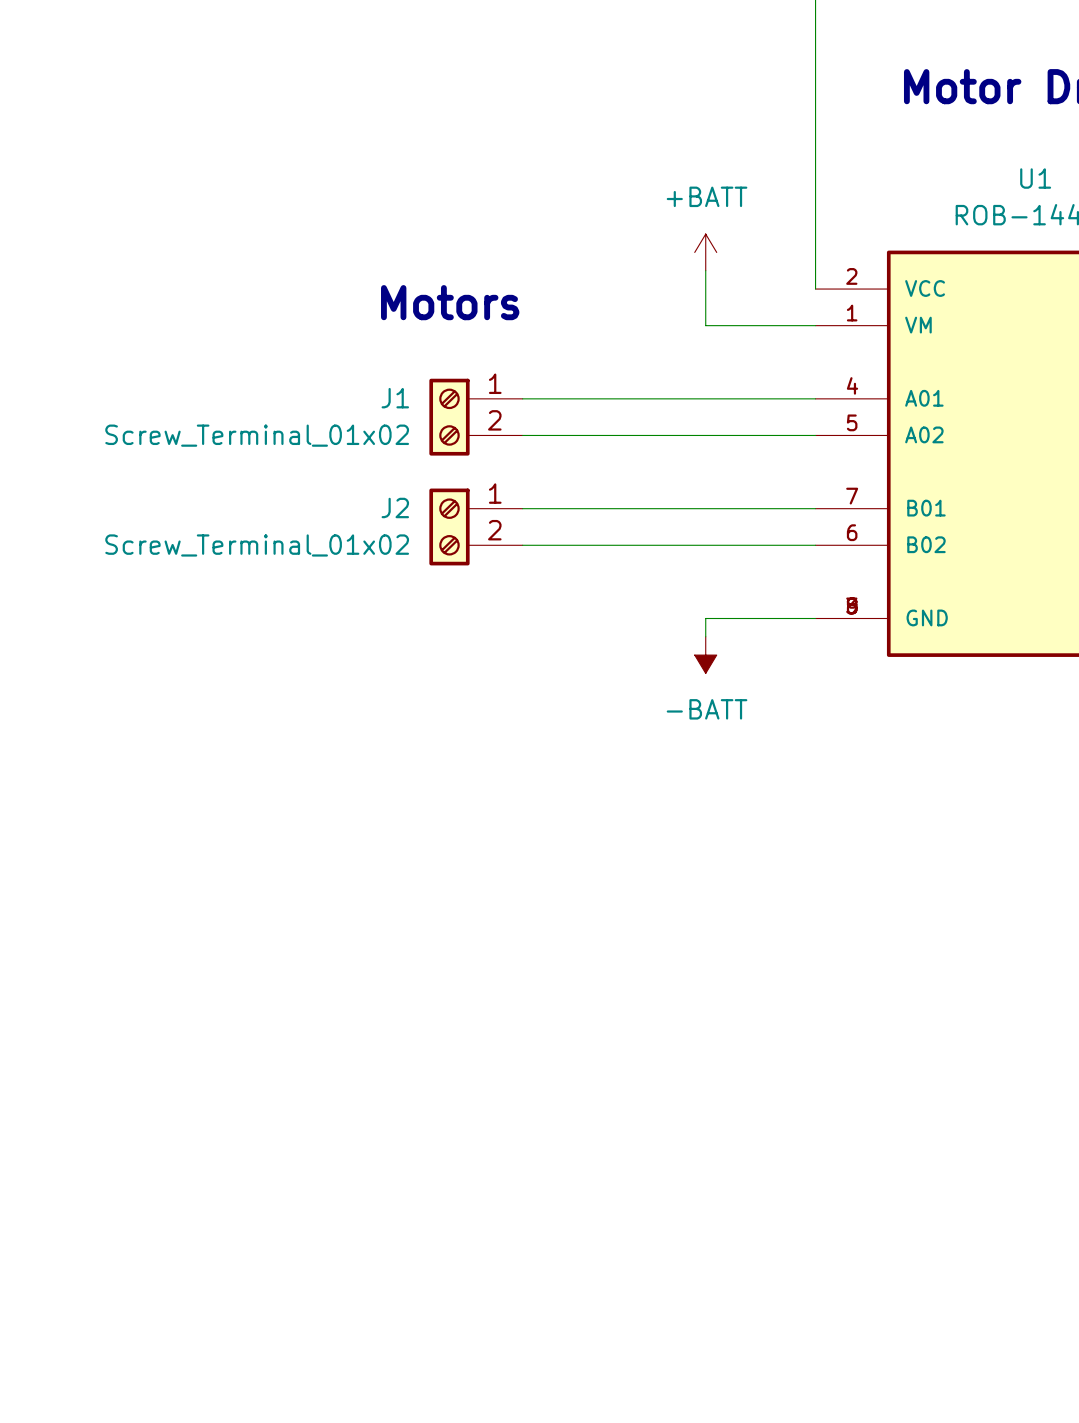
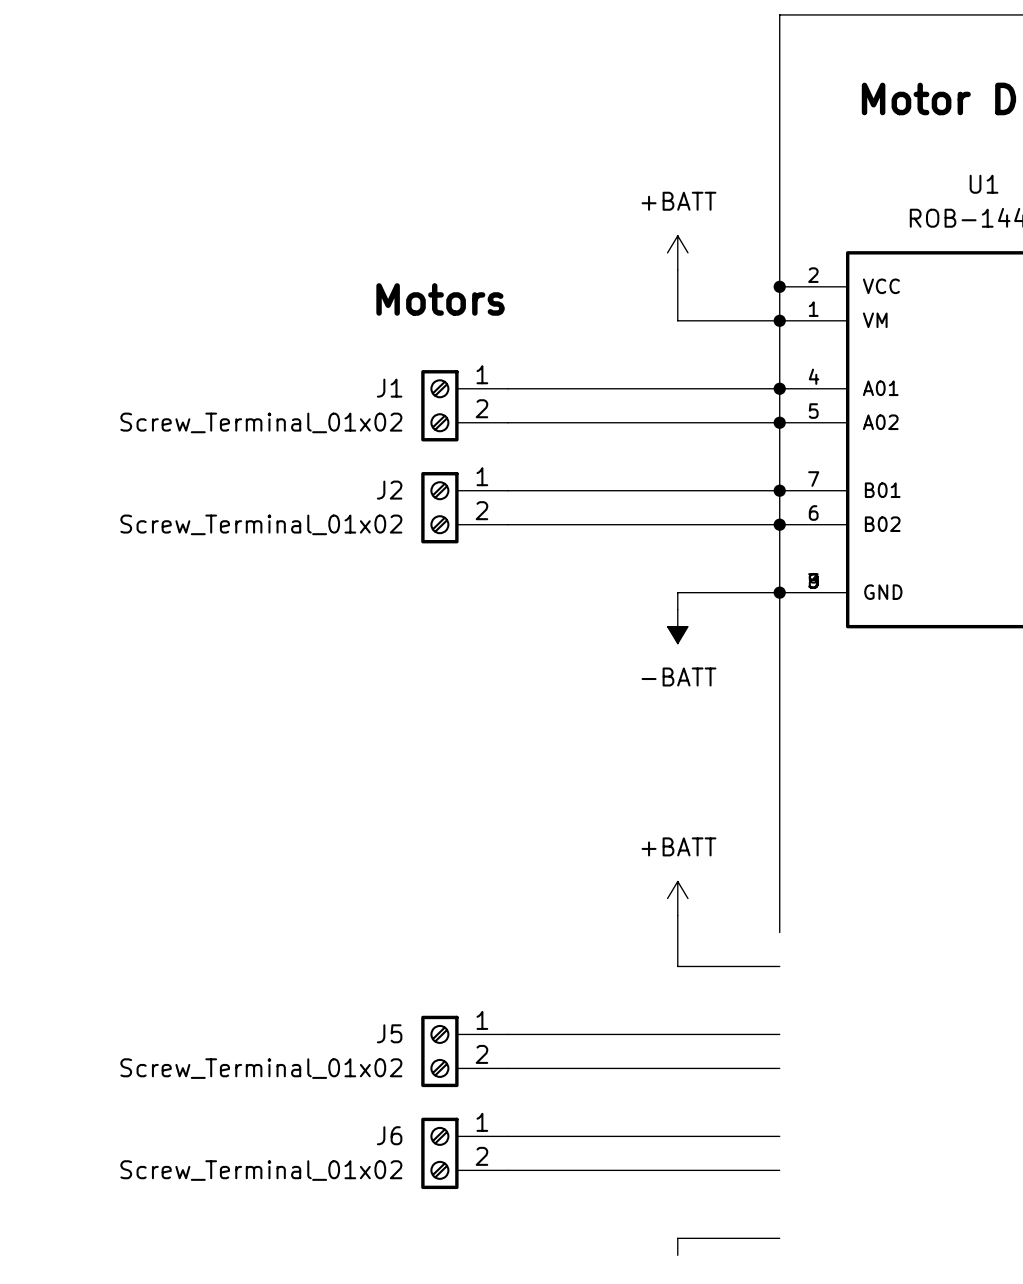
wire: none -> (779, 286) (779, 932)
junction: none -> (779, 286)
junction: none -> (779, 320)
junction: none -> (779, 388)
junction: none -> (779, 422)
junction: none -> (779, 490)
junction: none -> (779, 524)
junction: none -> (779, 592)
power symbol: none -> +BATT (677, 898)
wire: none -> (677, 915) (677, 966) (779, 966)
wire: none -> (507, 1034) (779, 1034)
J5: none -> Screw_Terminal_01x02 (464, 1051)
wire: none -> (507, 1068) (779, 1068)
wire: none -> (507, 1136) (779, 1136)
J6: none -> Screw_Terminal_01x02 (464, 1153)
wire: none -> (507, 1170) (779, 1170)
wire: none -> (779, 1238) (677, 1238) (677, 1255)

